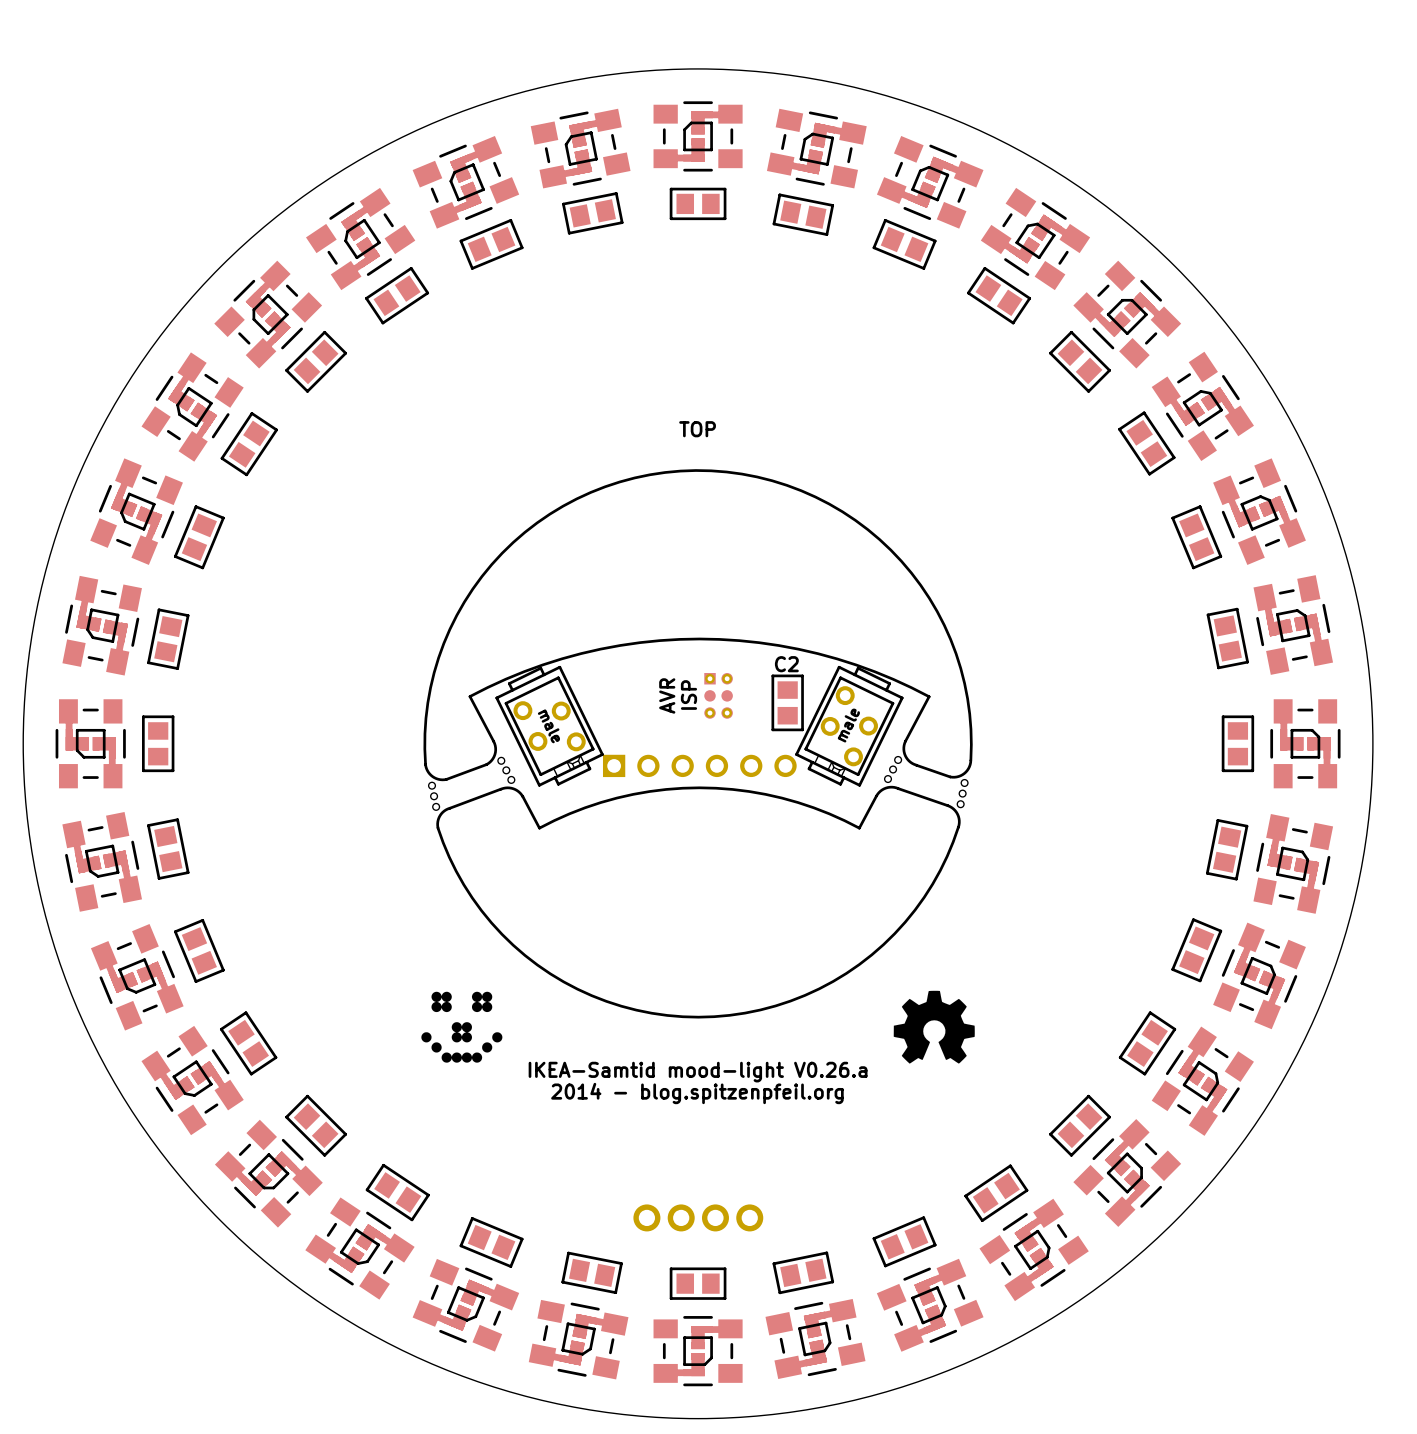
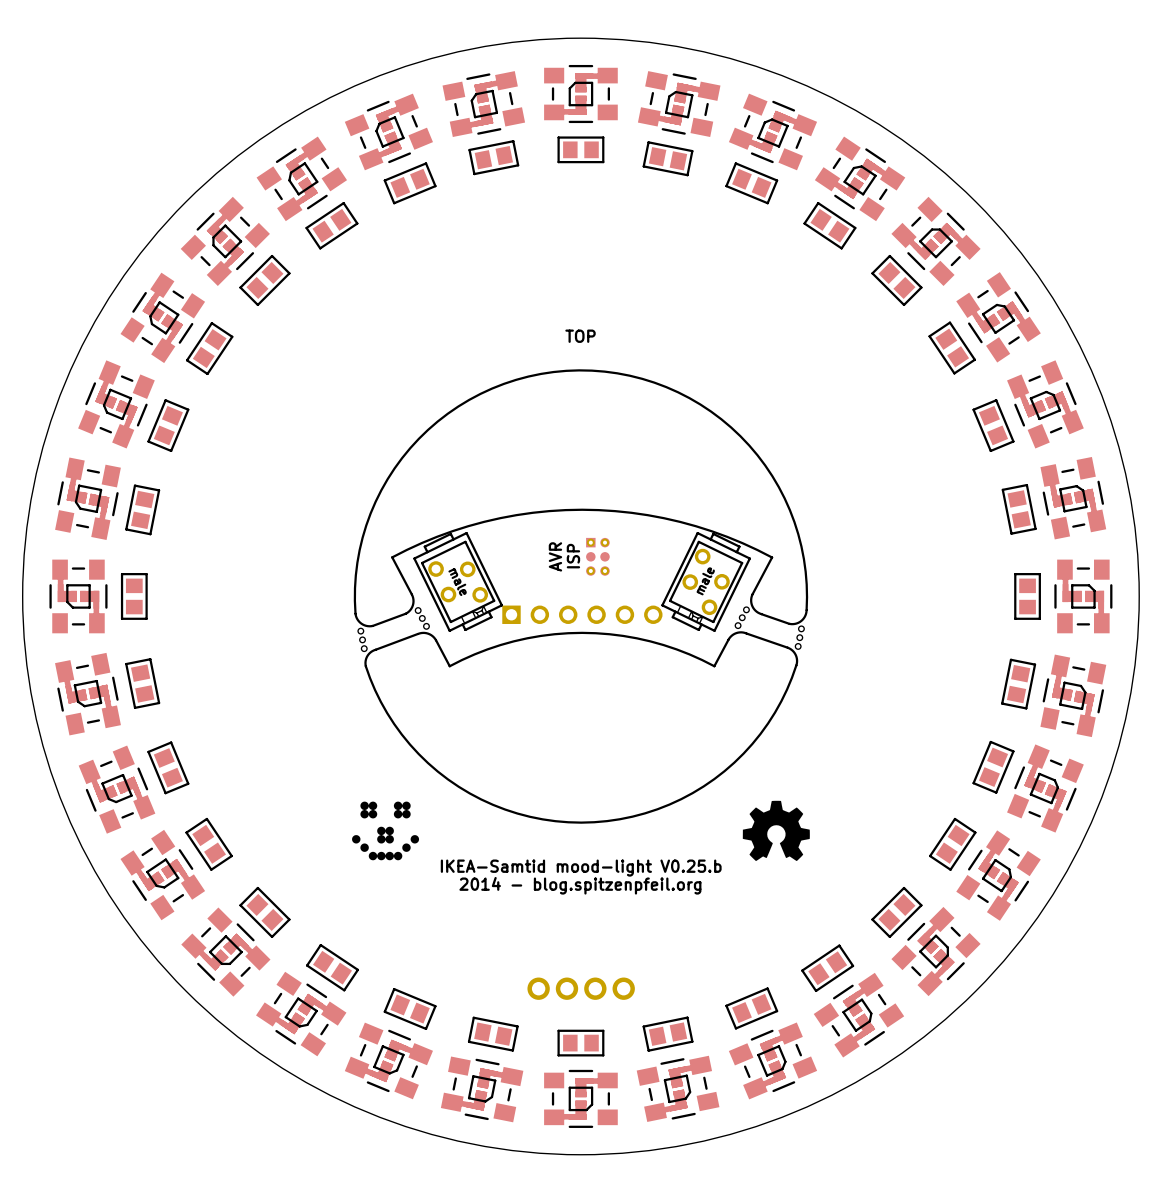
C2: (787, 702) -> none
text: IKEA-Samtid mood-light V0.26.a (698, 1072) -> IKEA-Samtid mood-light V0.25.b (581, 868)

